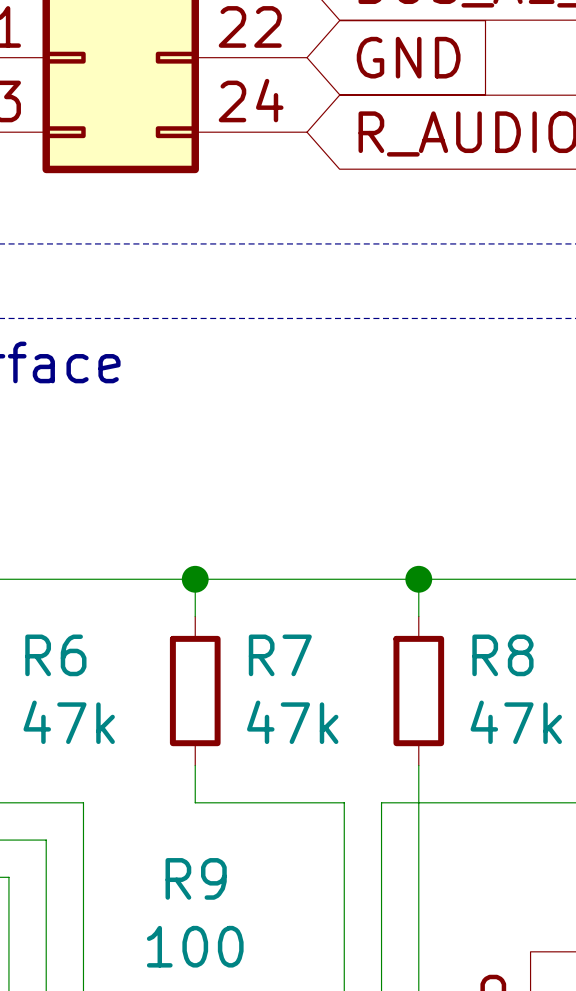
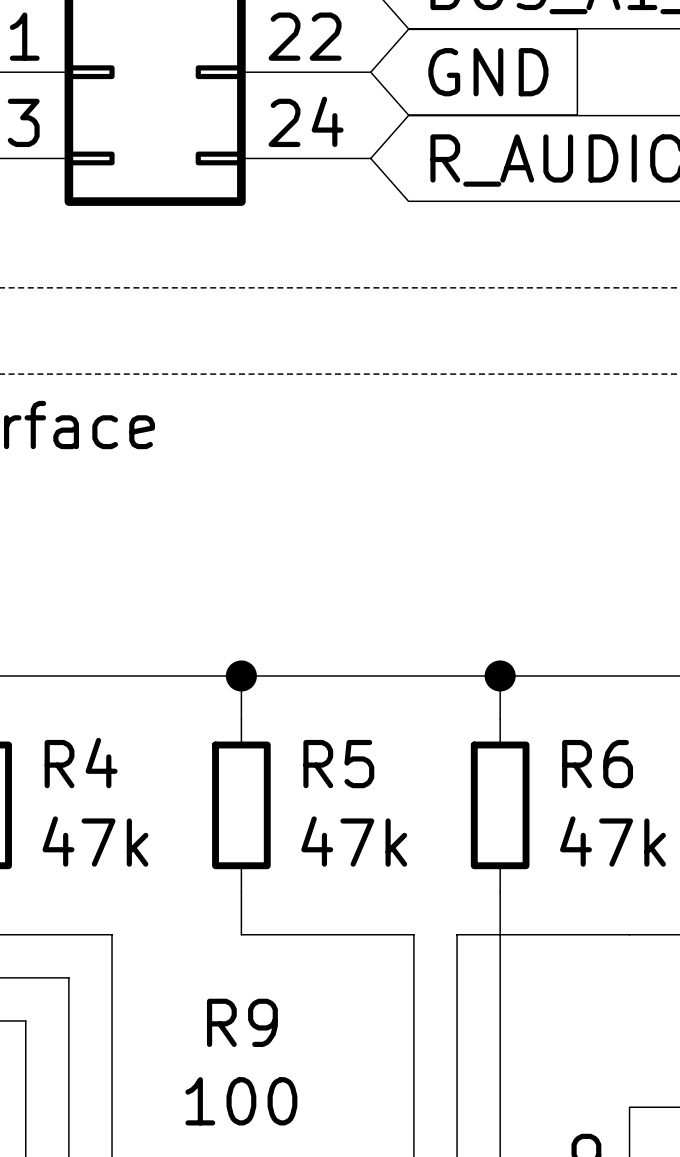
R6 name: R6 (55, 655) -> R4 (81, 763)
R7 name: R7 (280, 655) -> R5 (338, 764)
R8 name: R8 (502, 655) -> R6 (597, 764)

